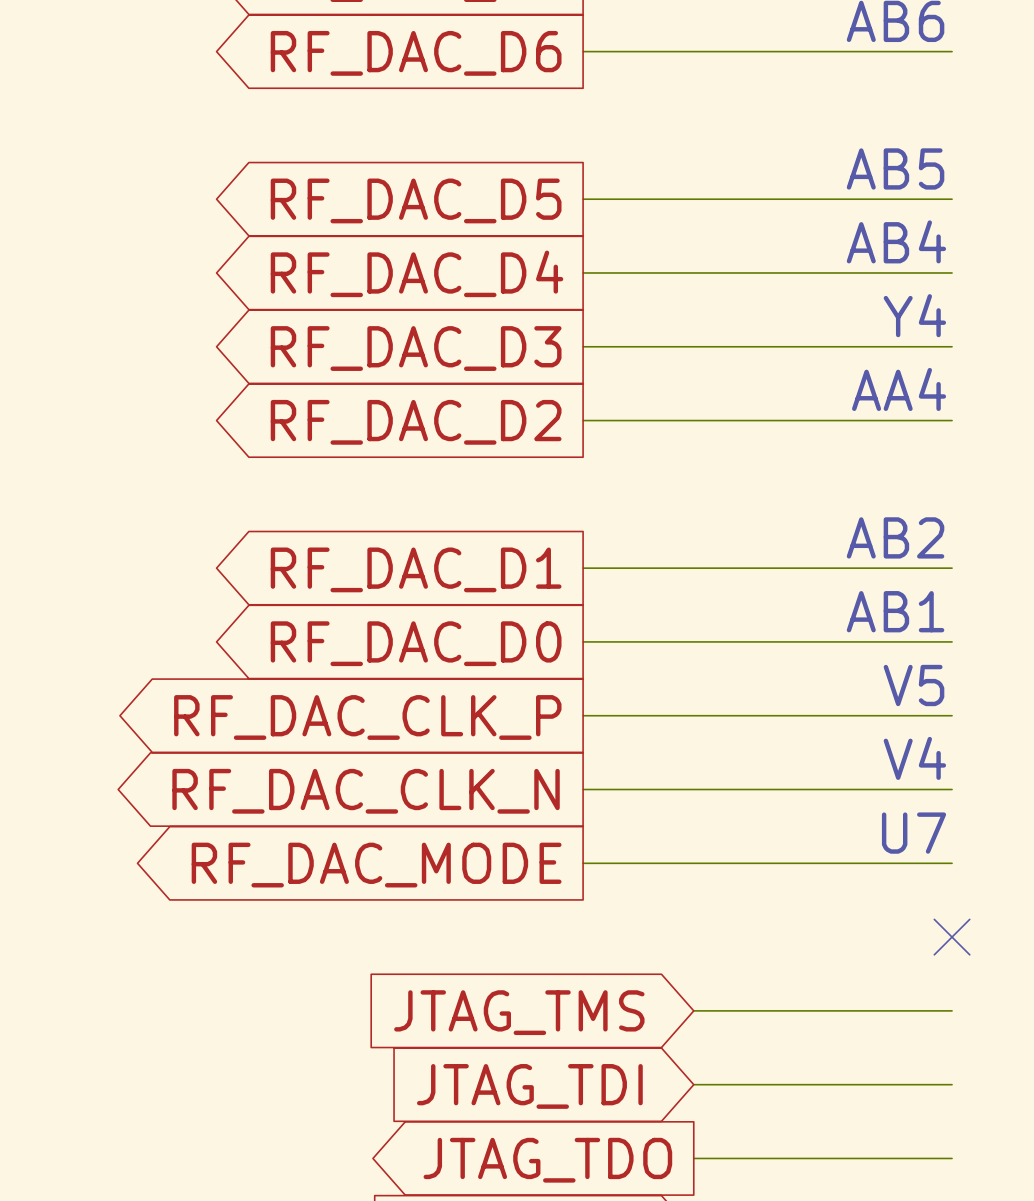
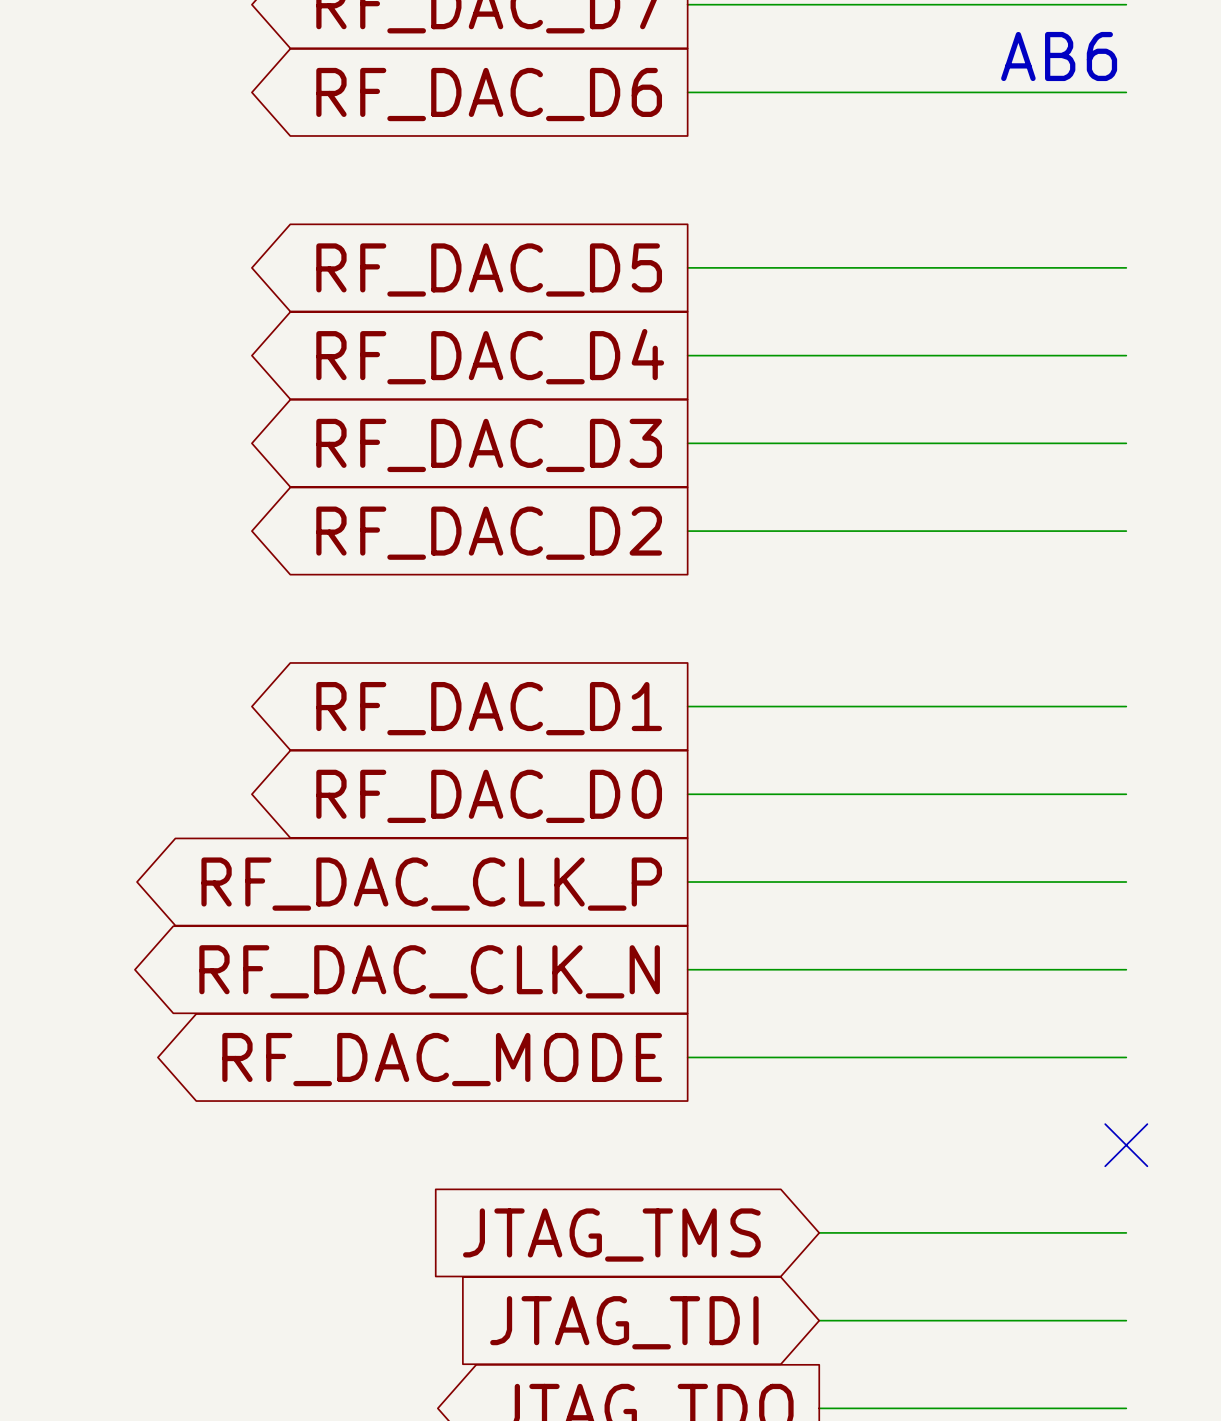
text: AB5 (895, 168) -> none
text: AB4 (896, 241) -> none
text: Y4 (914, 315) -> none
text: AA4 (899, 389) -> none
text: AB2 (895, 537) -> none
text: AB1 (895, 611) -> none
text: V5 (913, 685) -> none
text: V4 (914, 758) -> none
text: U7 (913, 833) -> none

